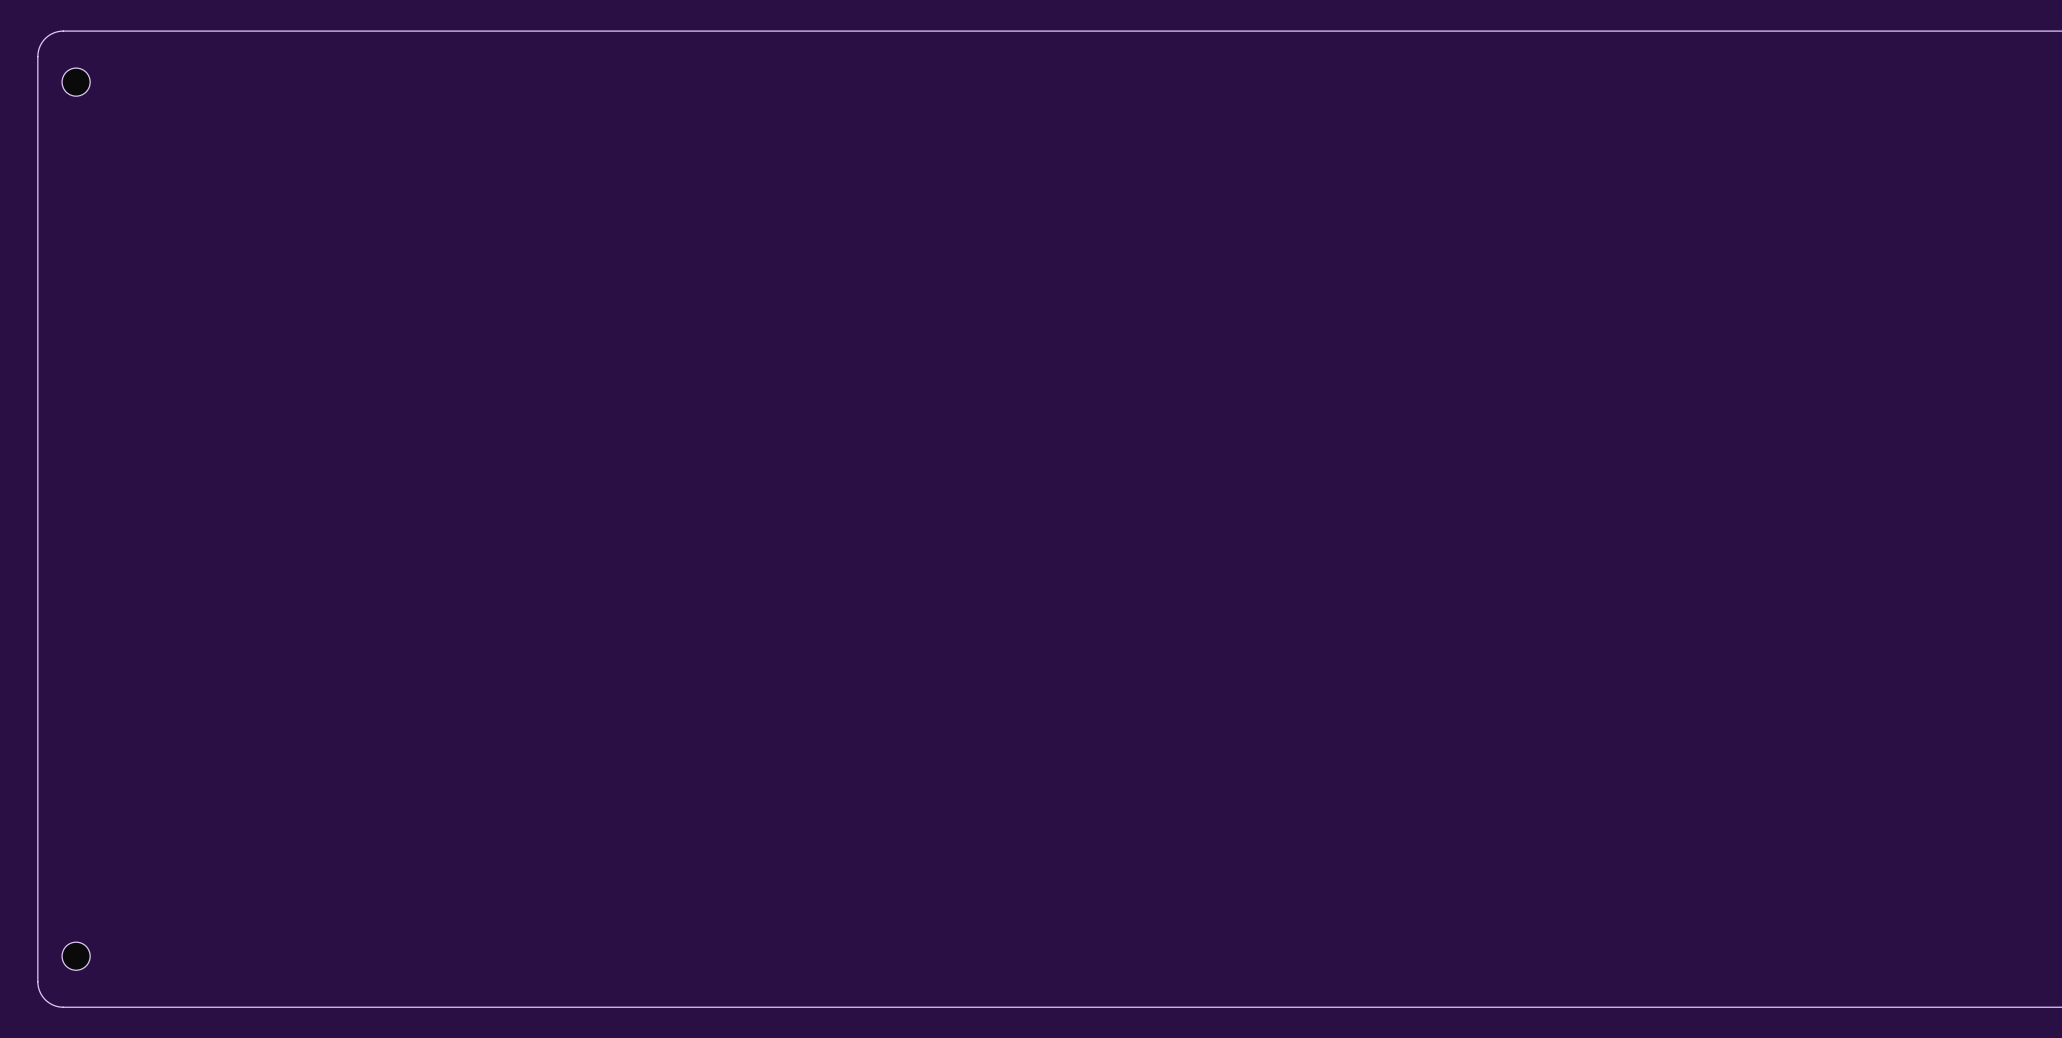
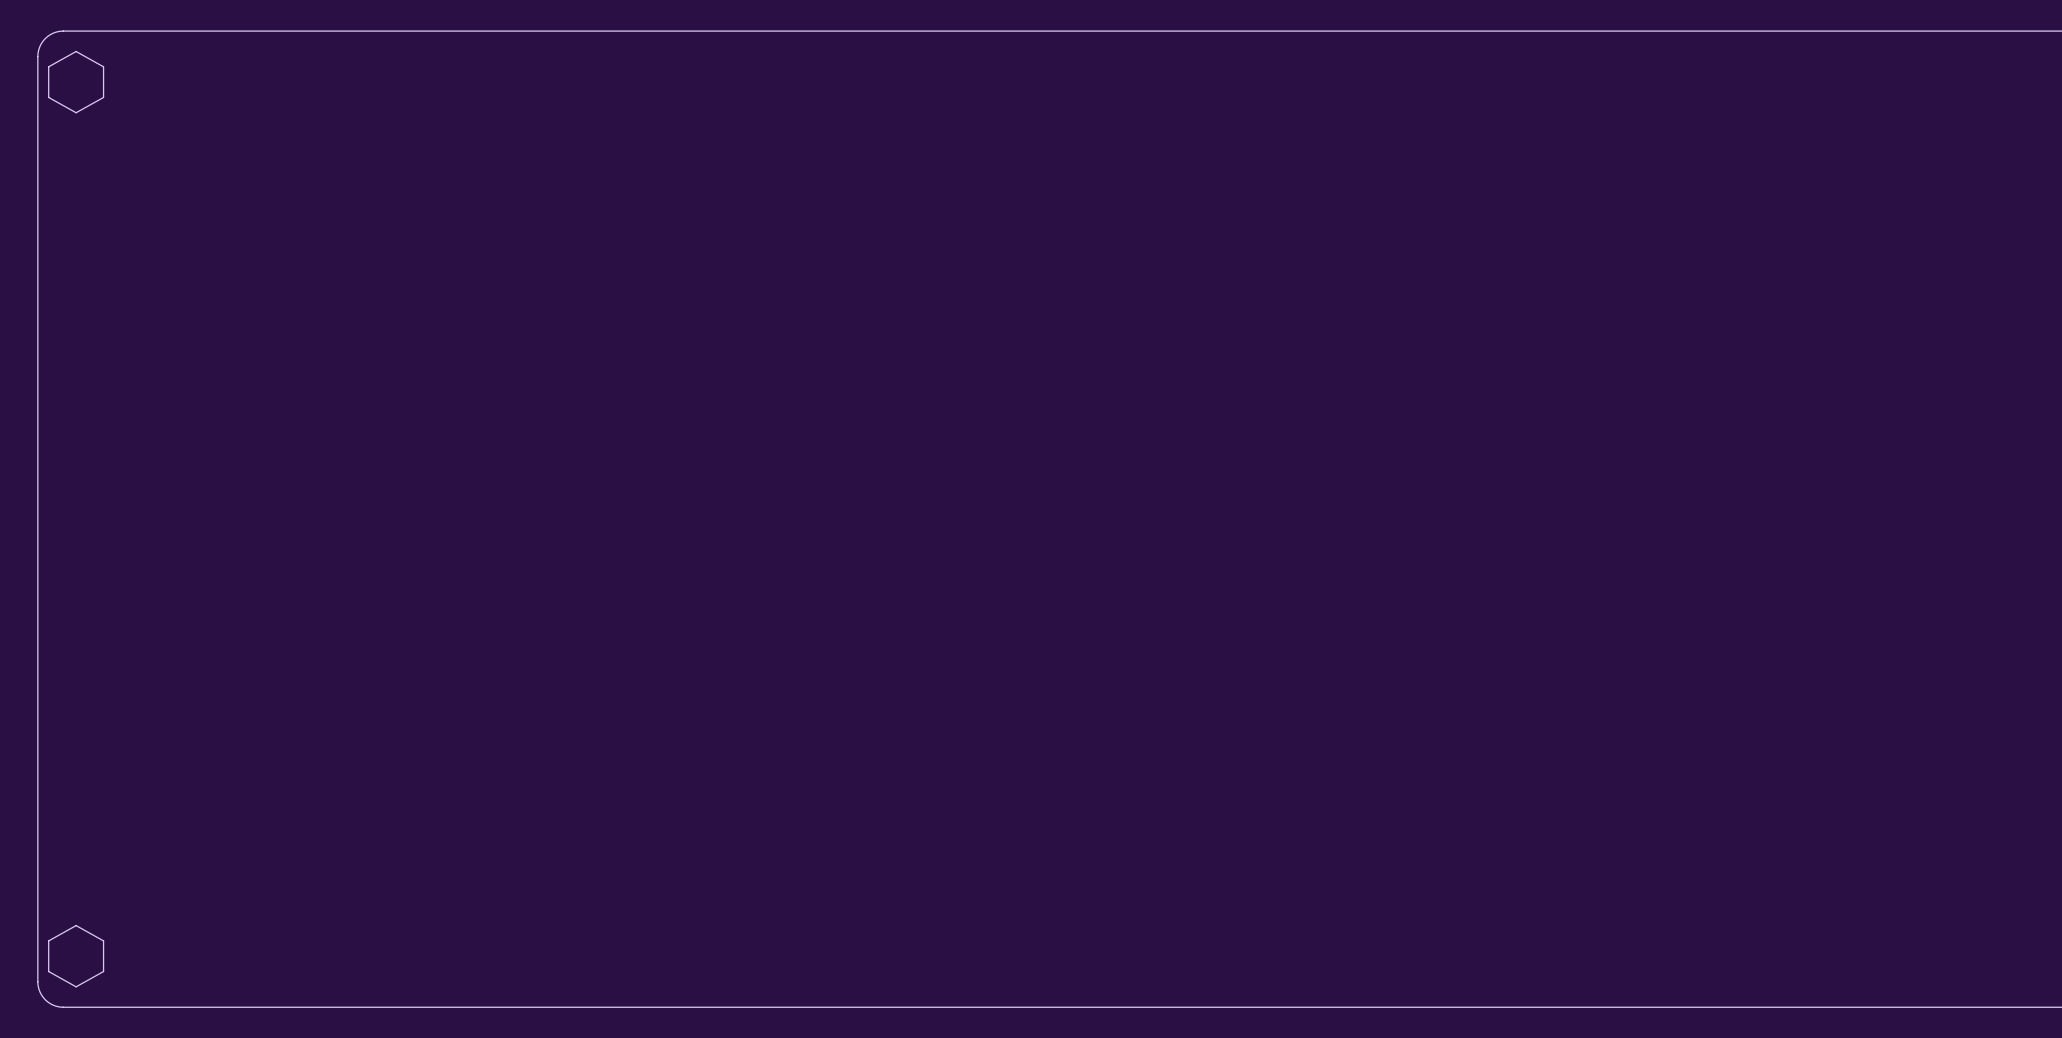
drawing: none -> [48, 50, 105, 114]
part: (76, 82) -> none
drawing: none -> [48, 924, 105, 988]
part: (76, 956) -> none

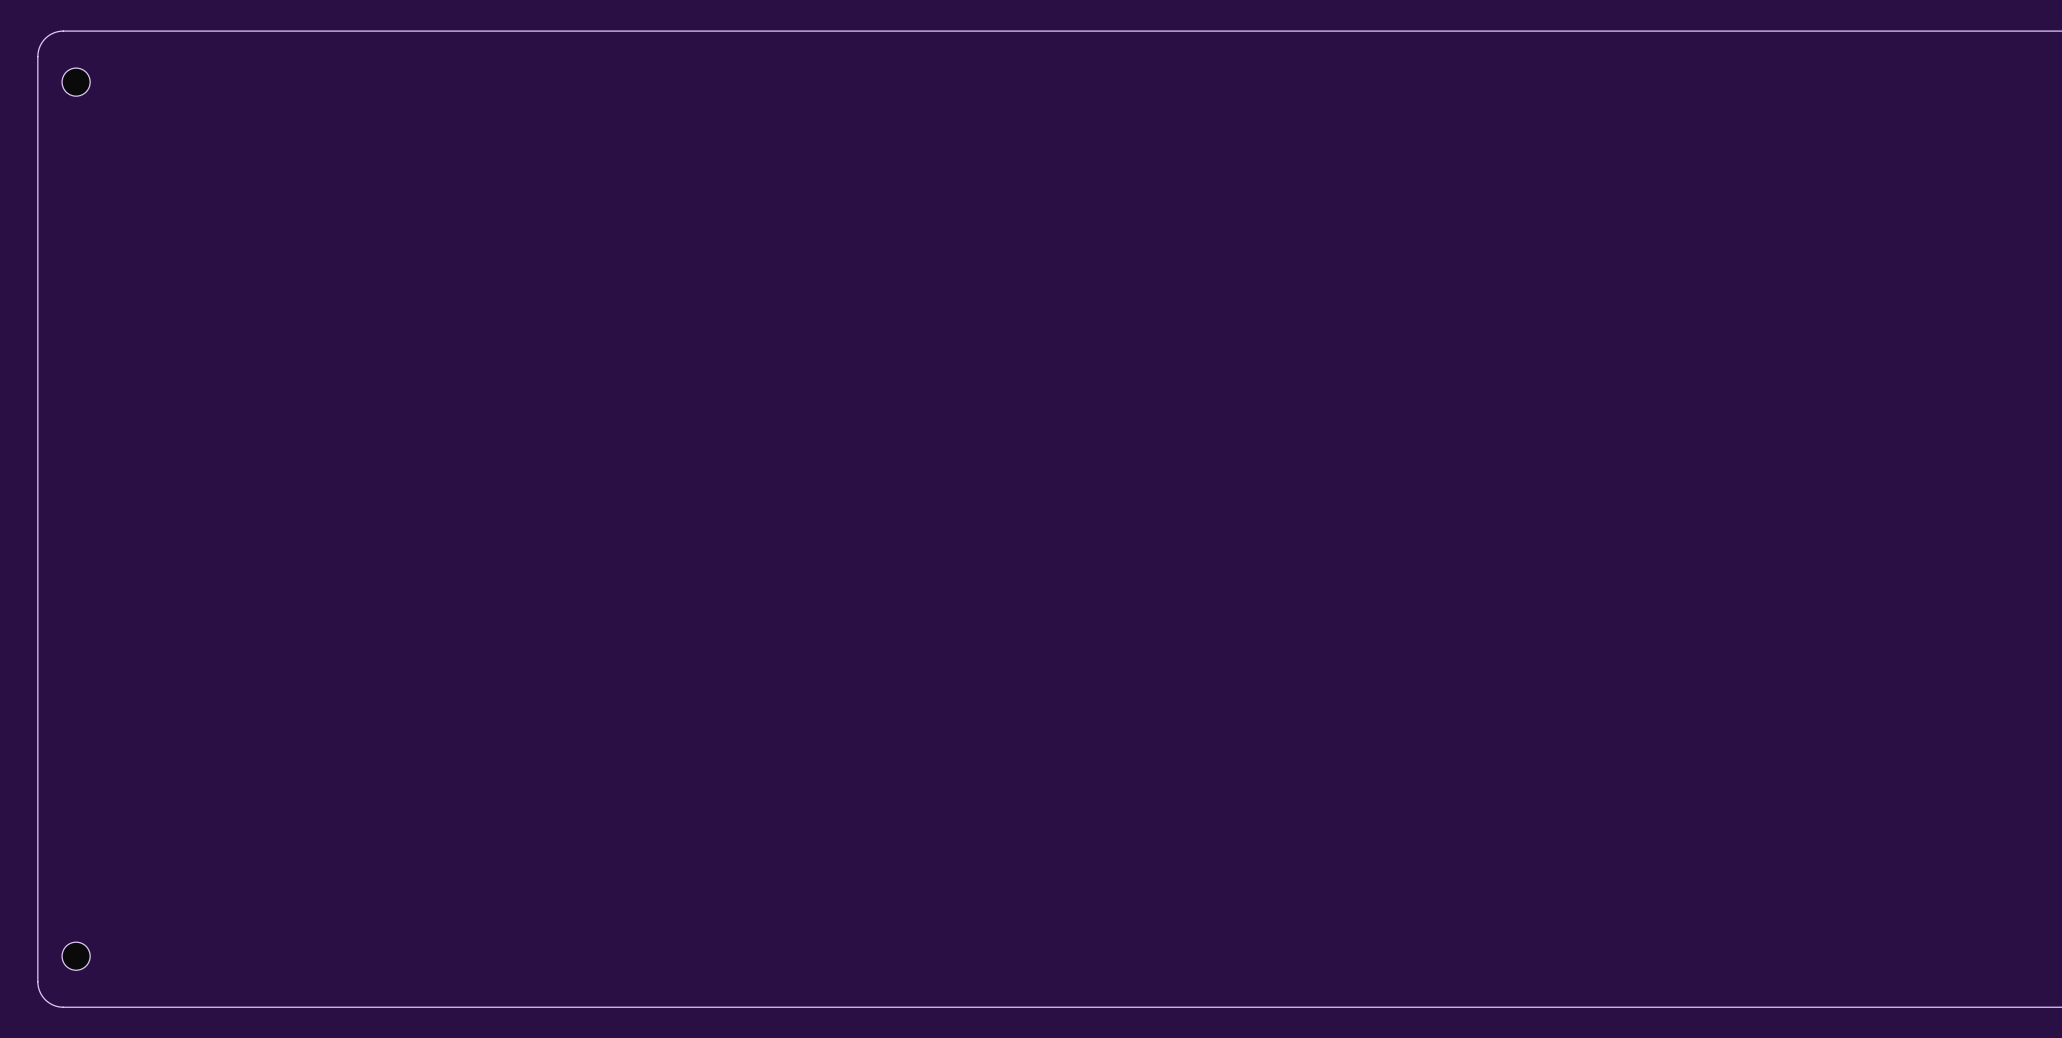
drawing: [48, 50, 105, 114] -> none
part: none -> (76, 82)
drawing: [48, 924, 105, 988] -> none
part: none -> (76, 956)

